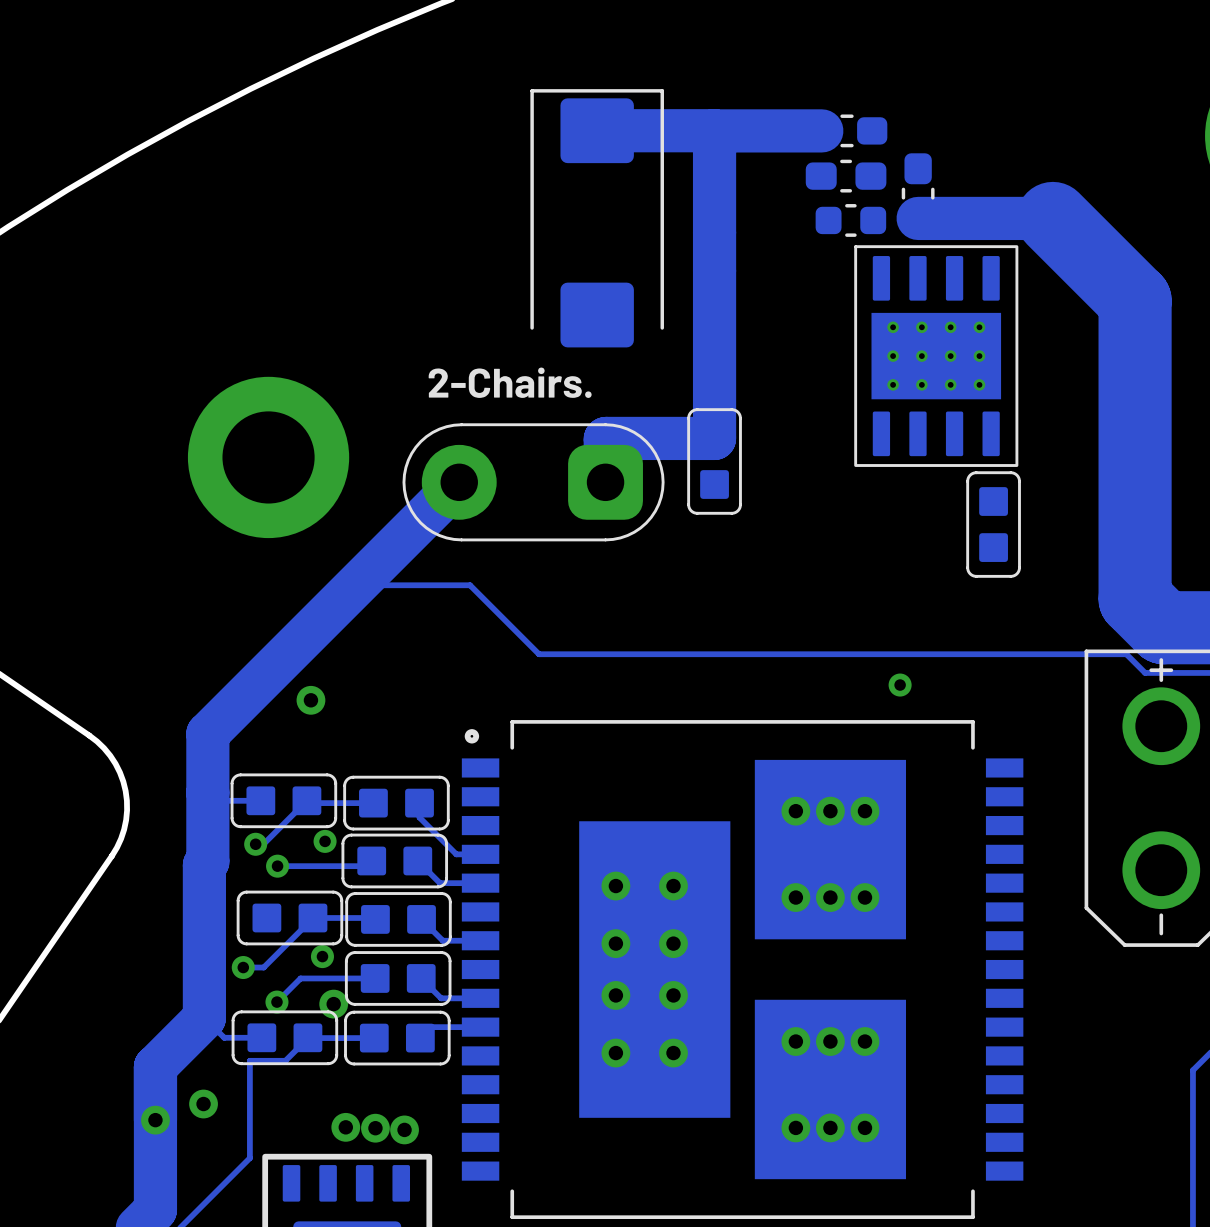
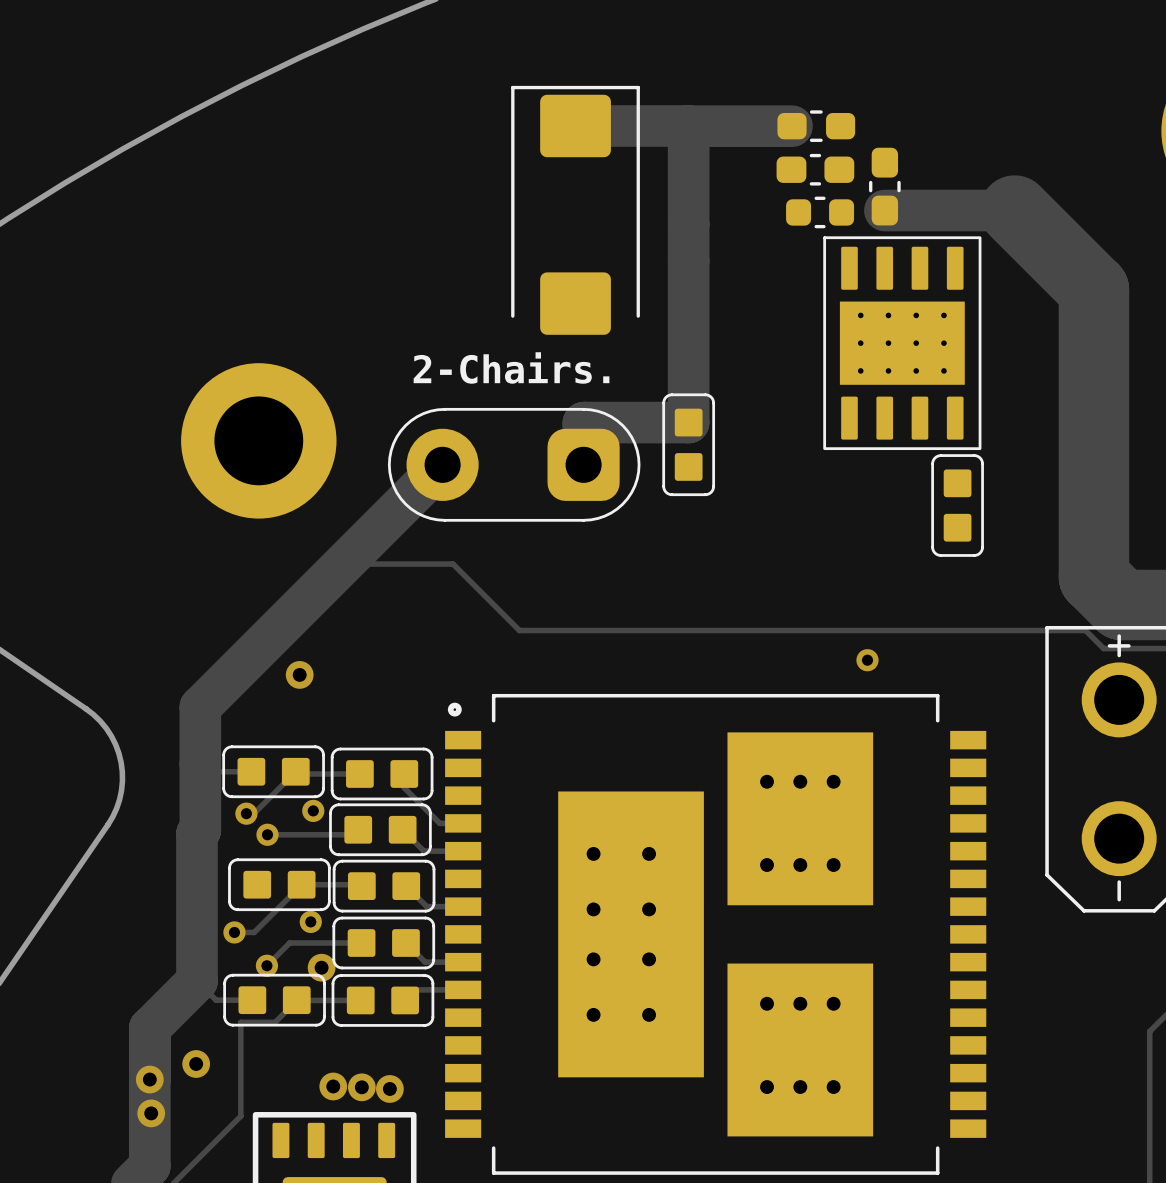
via: none -> (151, 1113)

